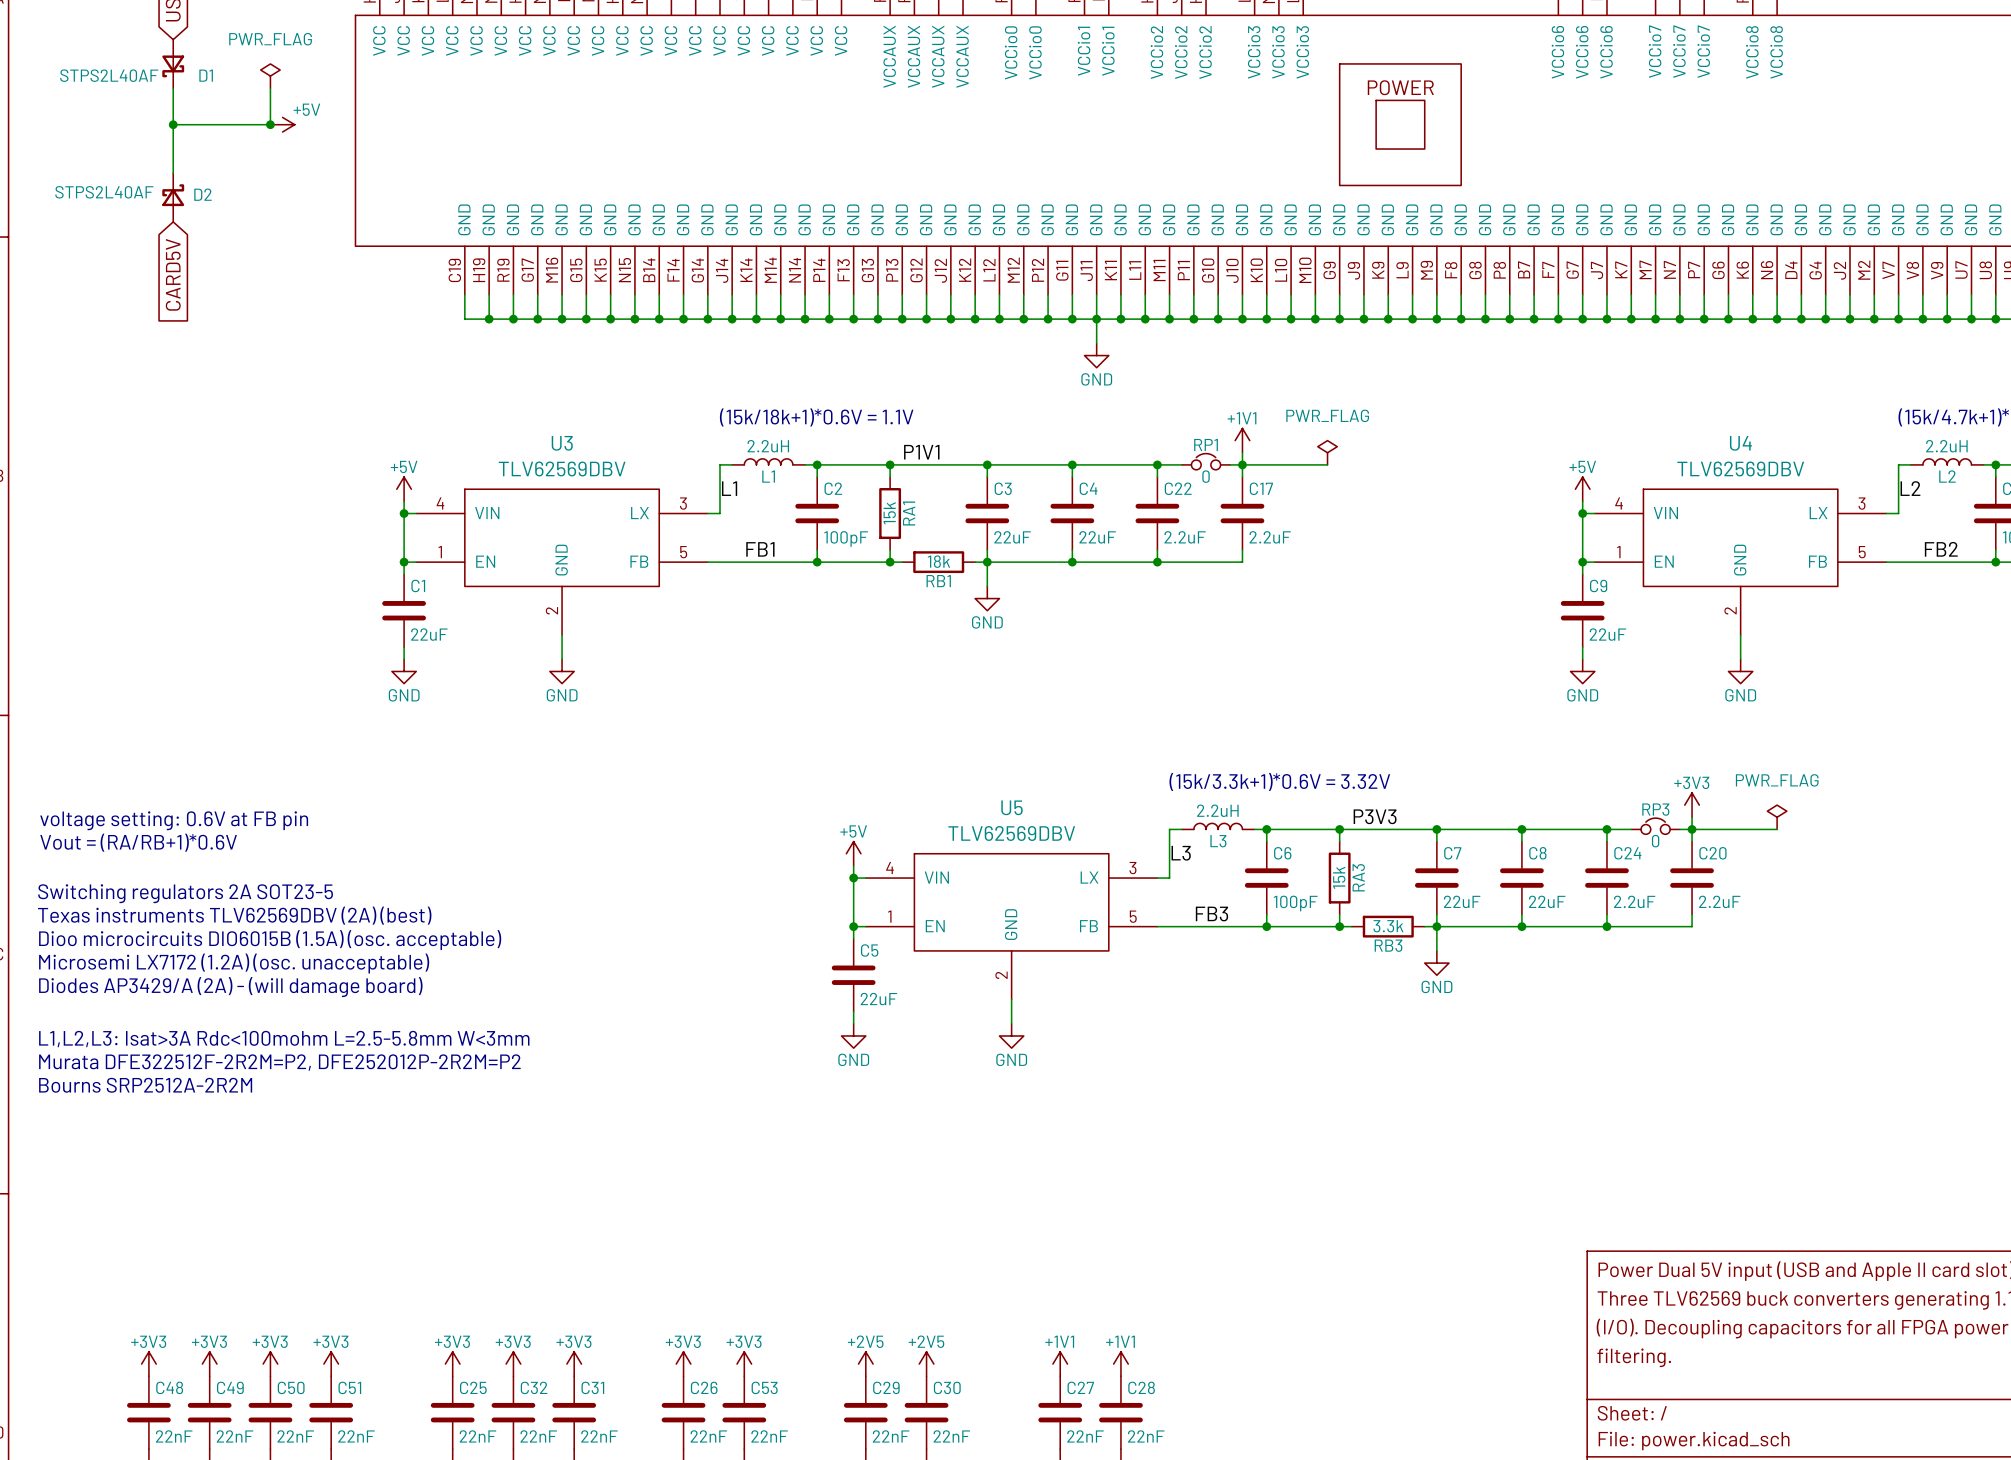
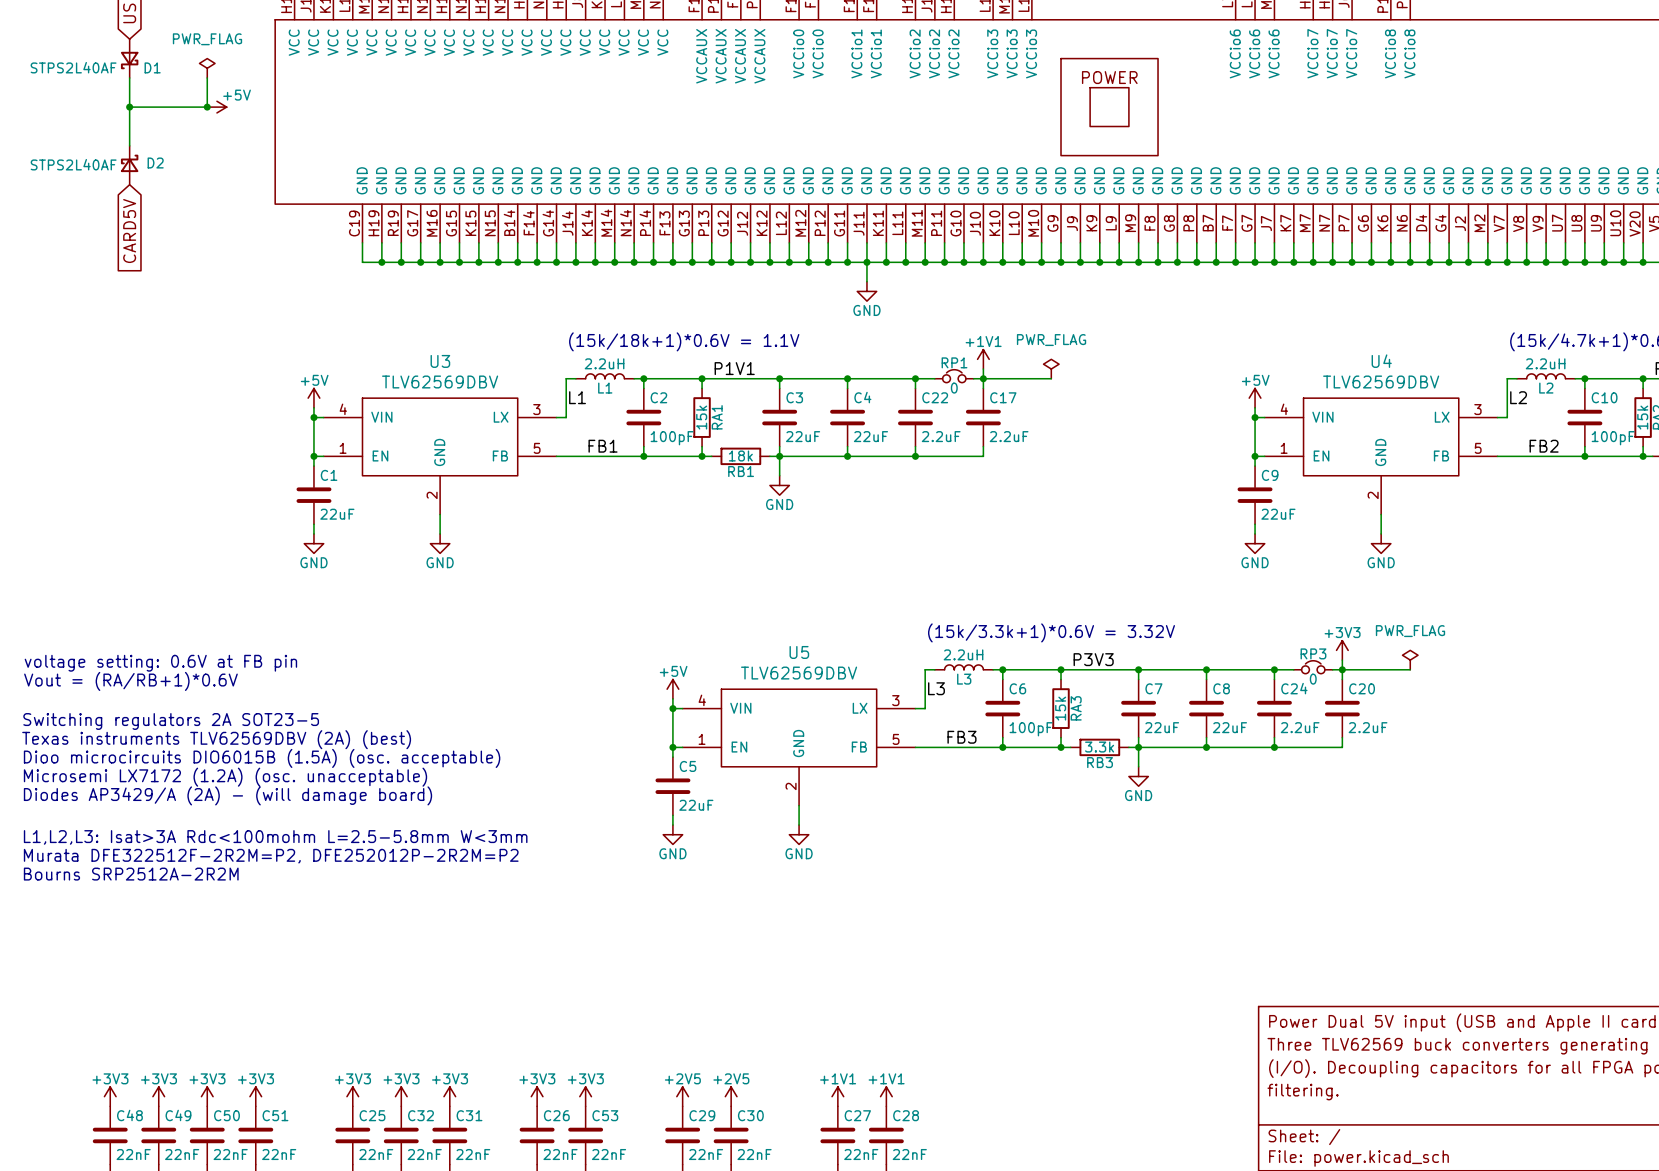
D2 value position: STPS2L40AF (104, 192) -> STPS2L40AF (73, 164)

